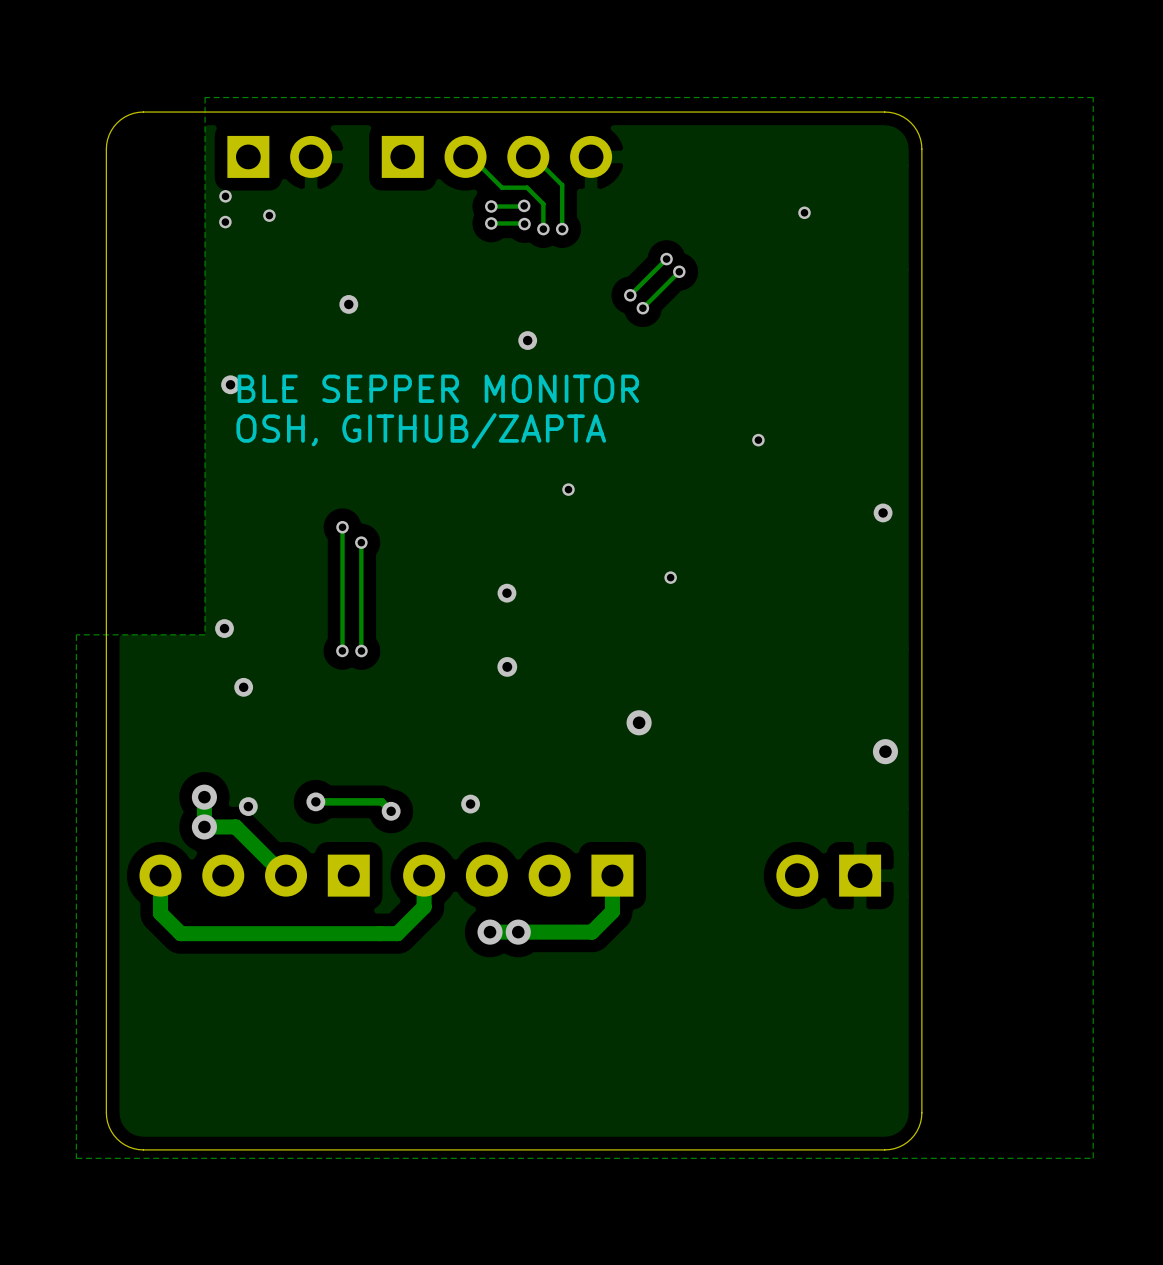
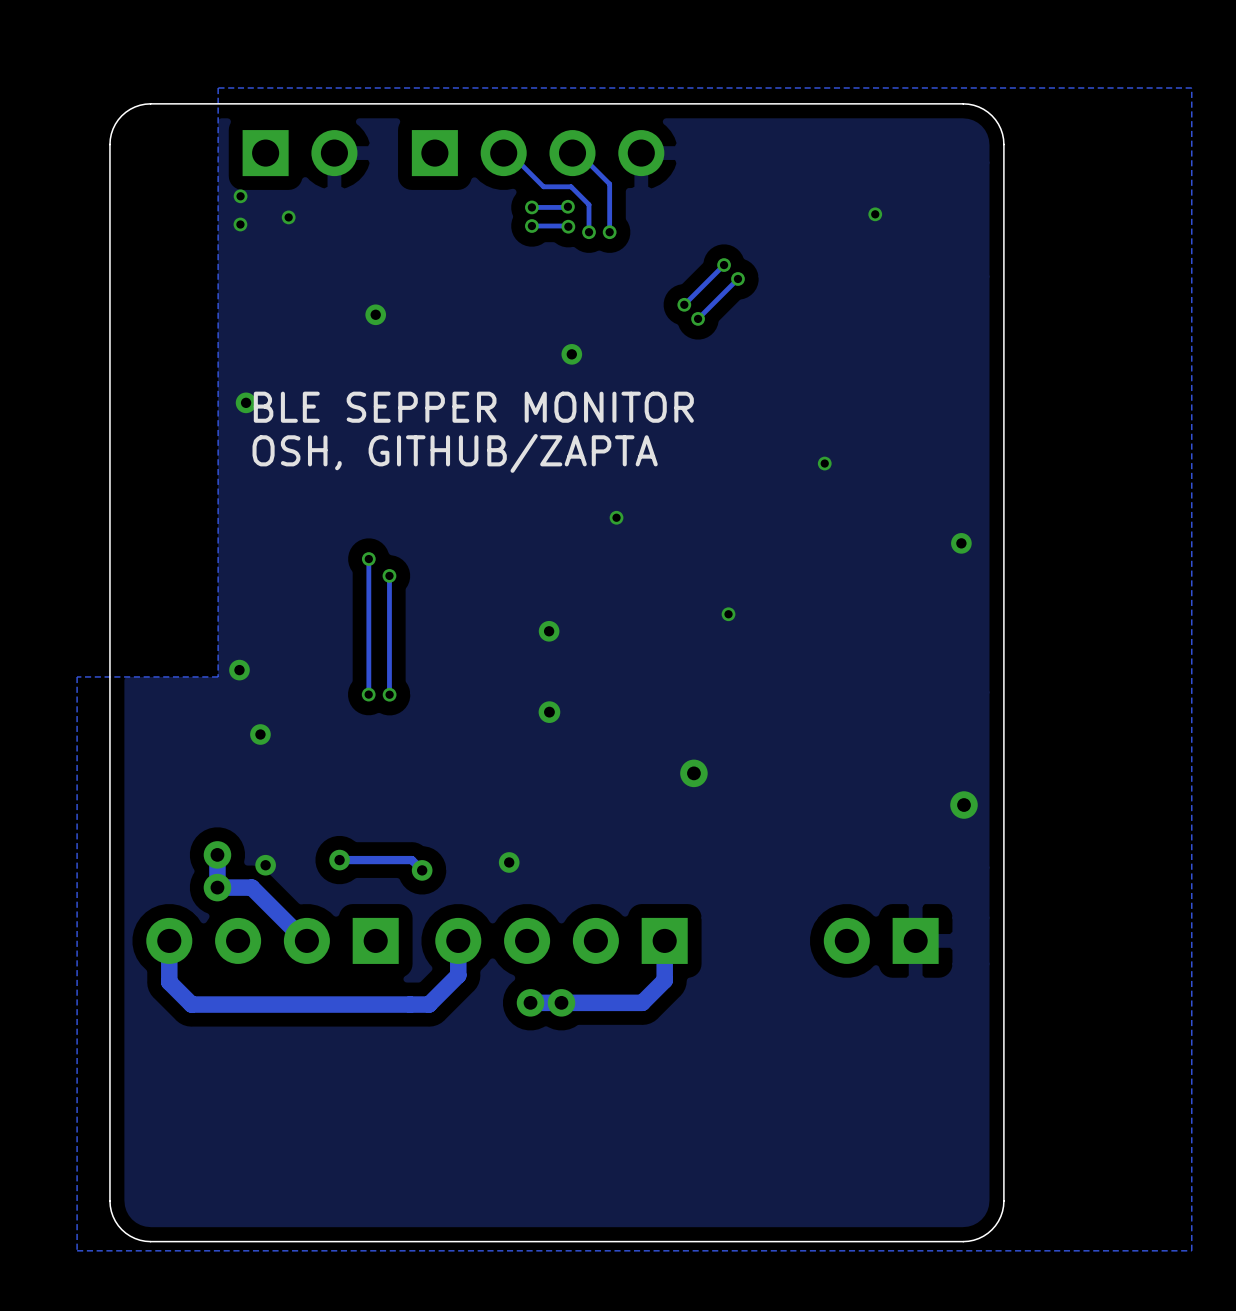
part footprint: [776, 854, 882, 897] -> [823, 917, 939, 964]

